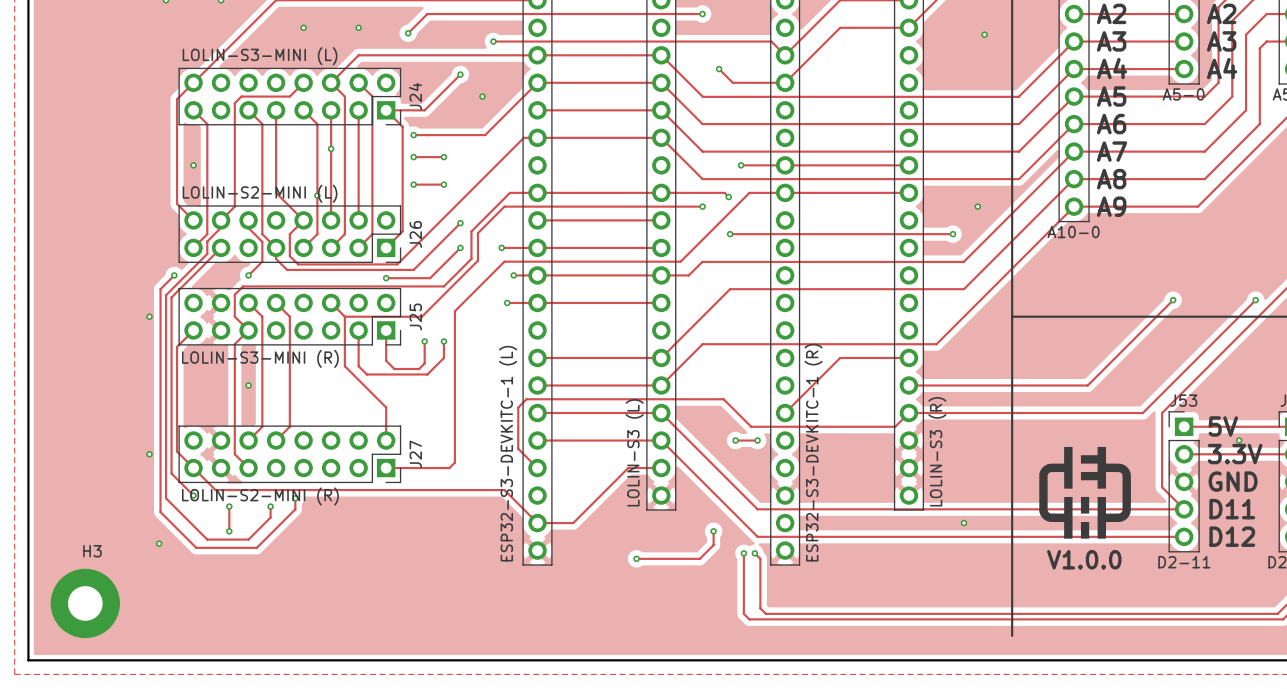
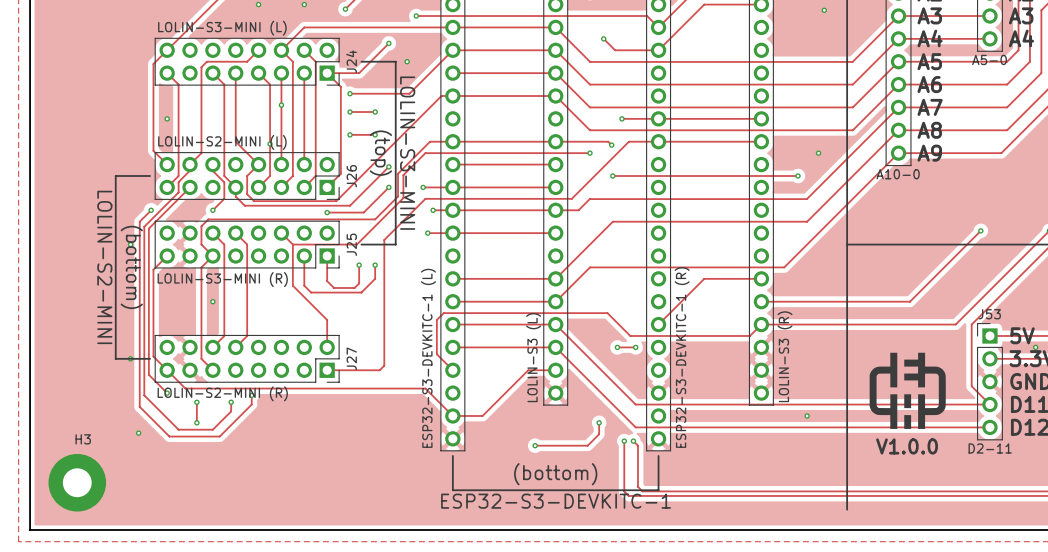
line: none -> (361, 61) (395, 61) (395, 244) (361, 244)
text: none -> (top) (380, 153)
text: none -> LOLIN-S3-MINI (407, 153)
line: none -> (150, 176) (115, 176) (115, 358) (150, 358)
text: none -> LOLIN-S2-MINI (104, 267)
text: none -> (bottom) (131, 267)
line: none -> (452, 455) (452, 490) (658, 490) (658, 455)
text: none -> (bottom) (555, 474)
text: none -> ESP32-S3-DEVKITC-1 (556, 501)

